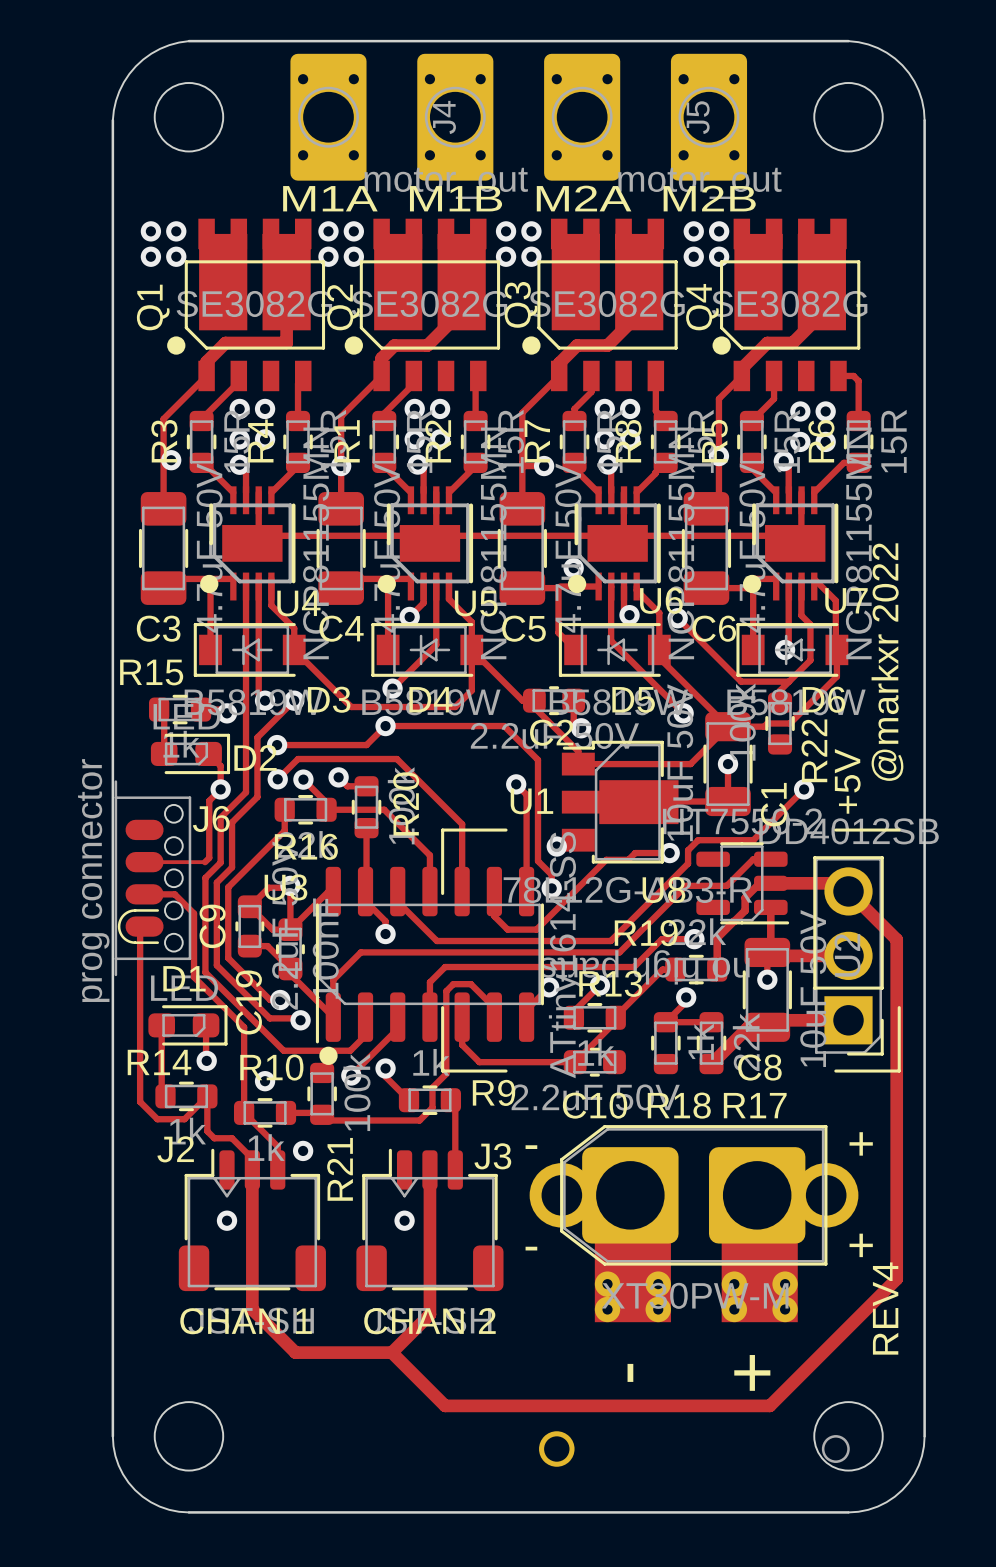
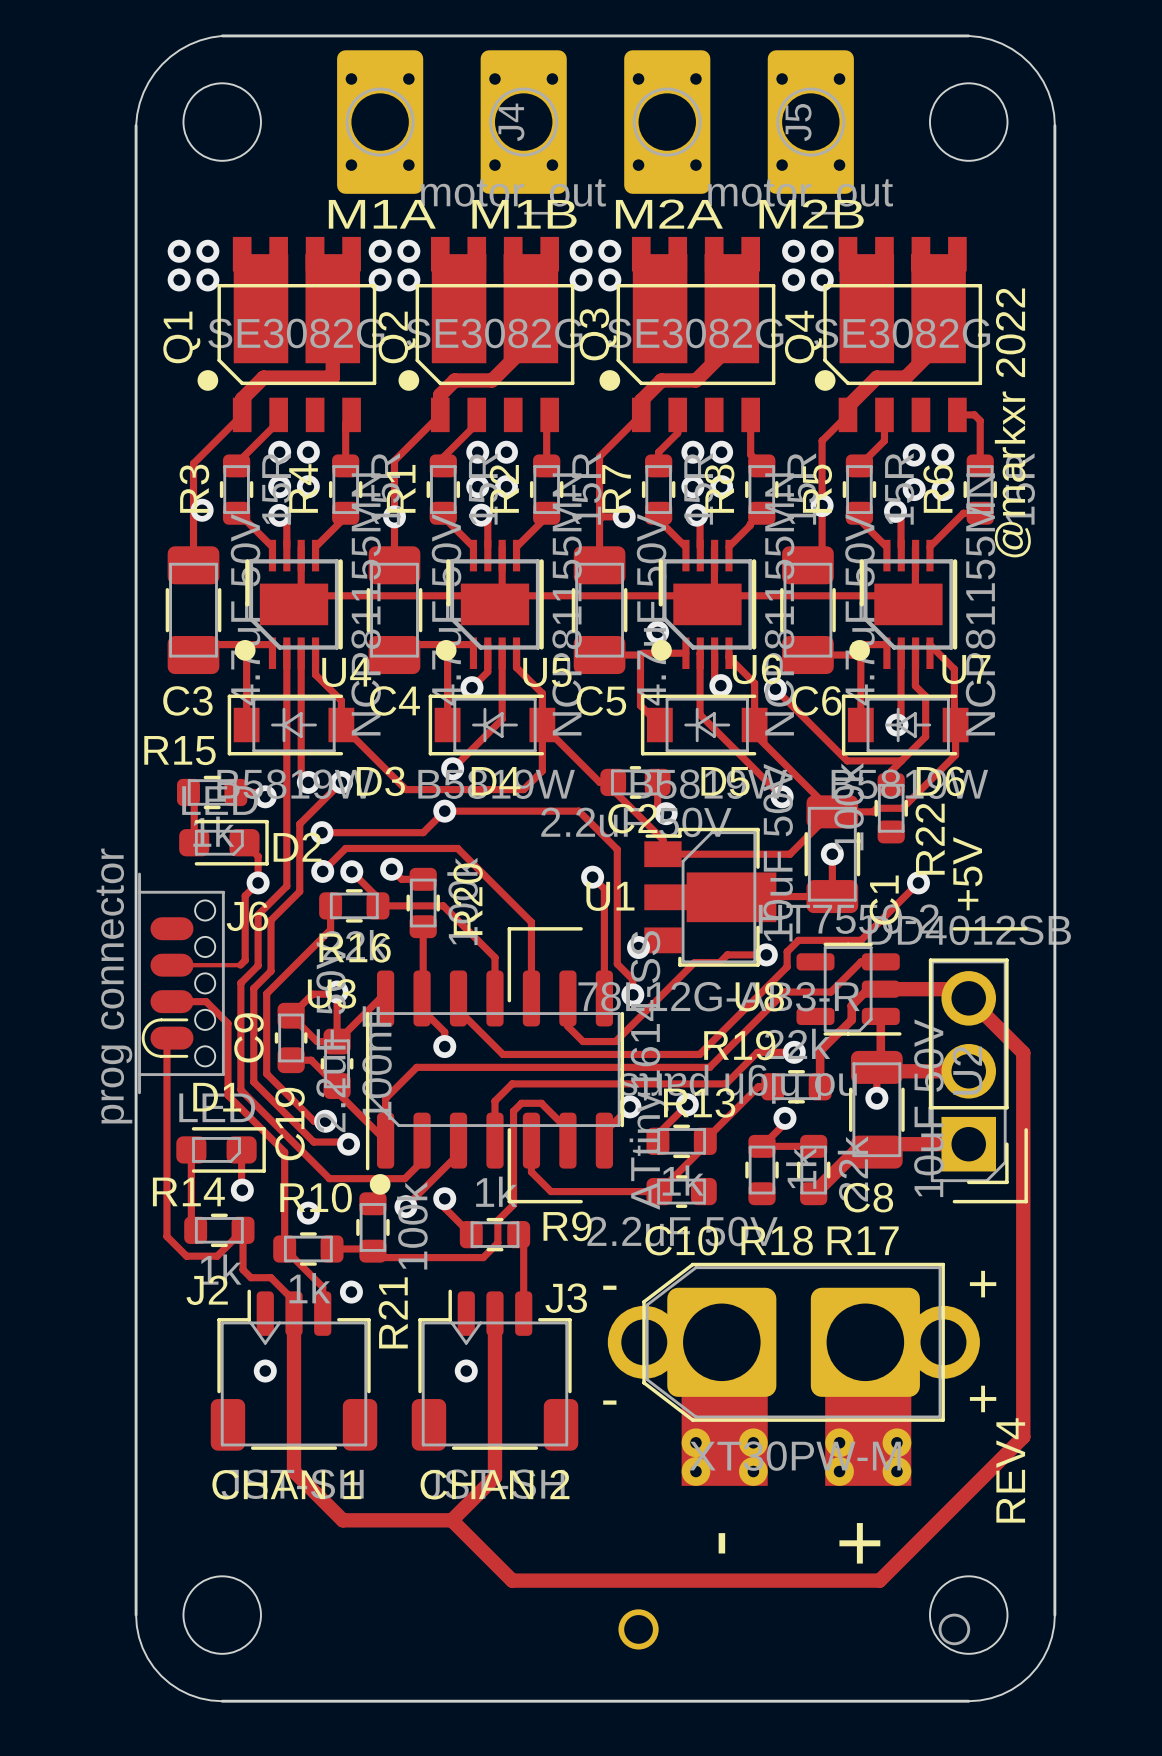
text position: @markxr 2022 (887, 662) -> @markxr 2022 (1012, 422)

